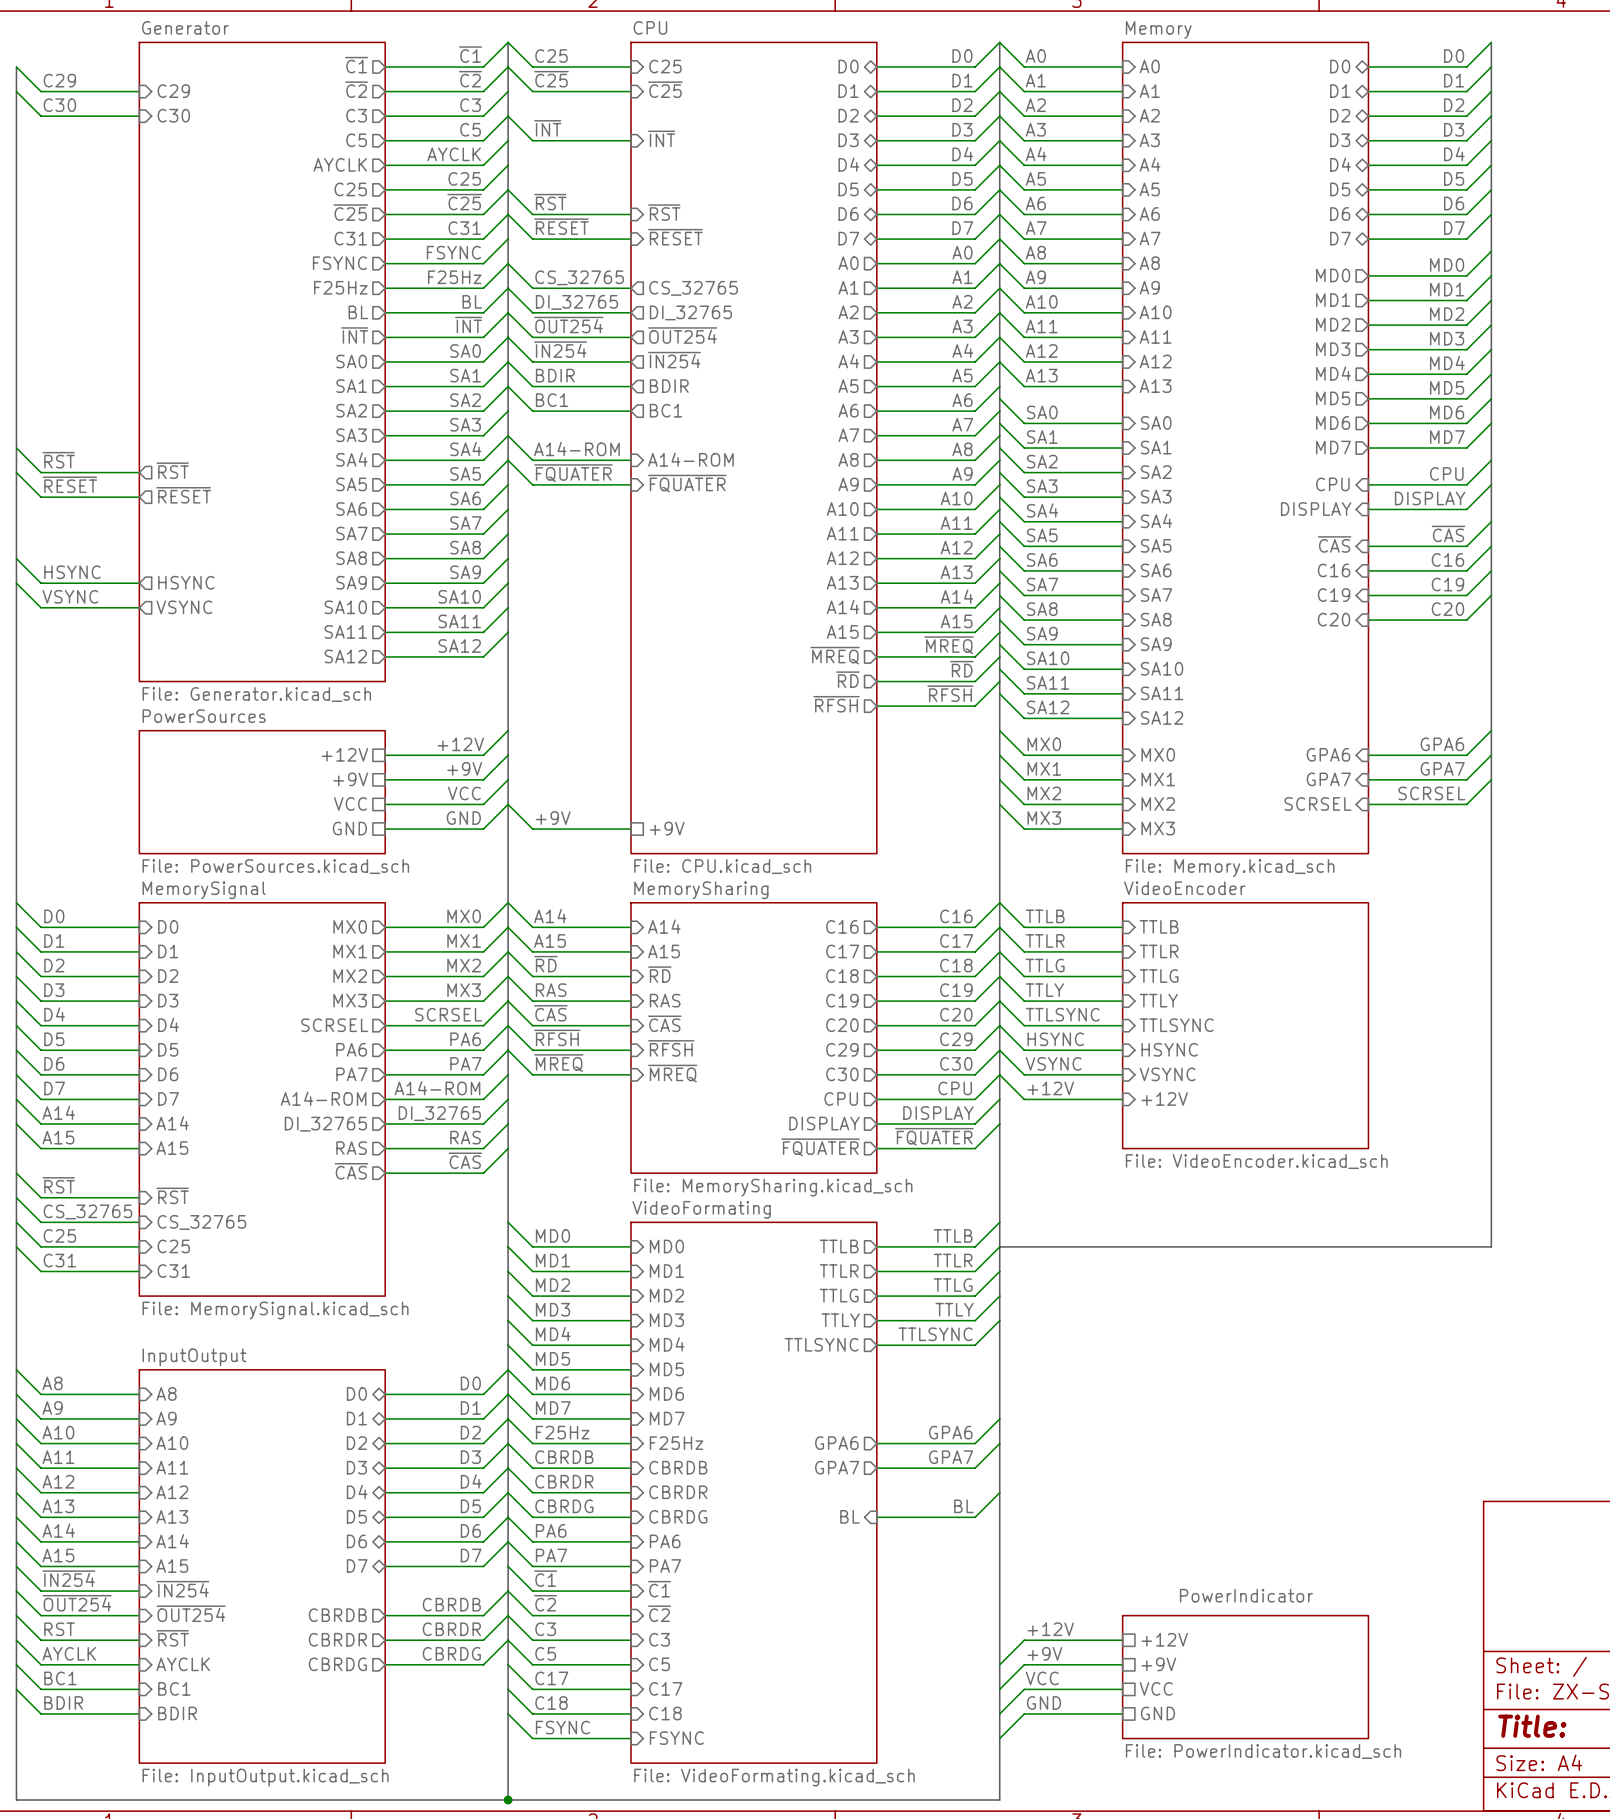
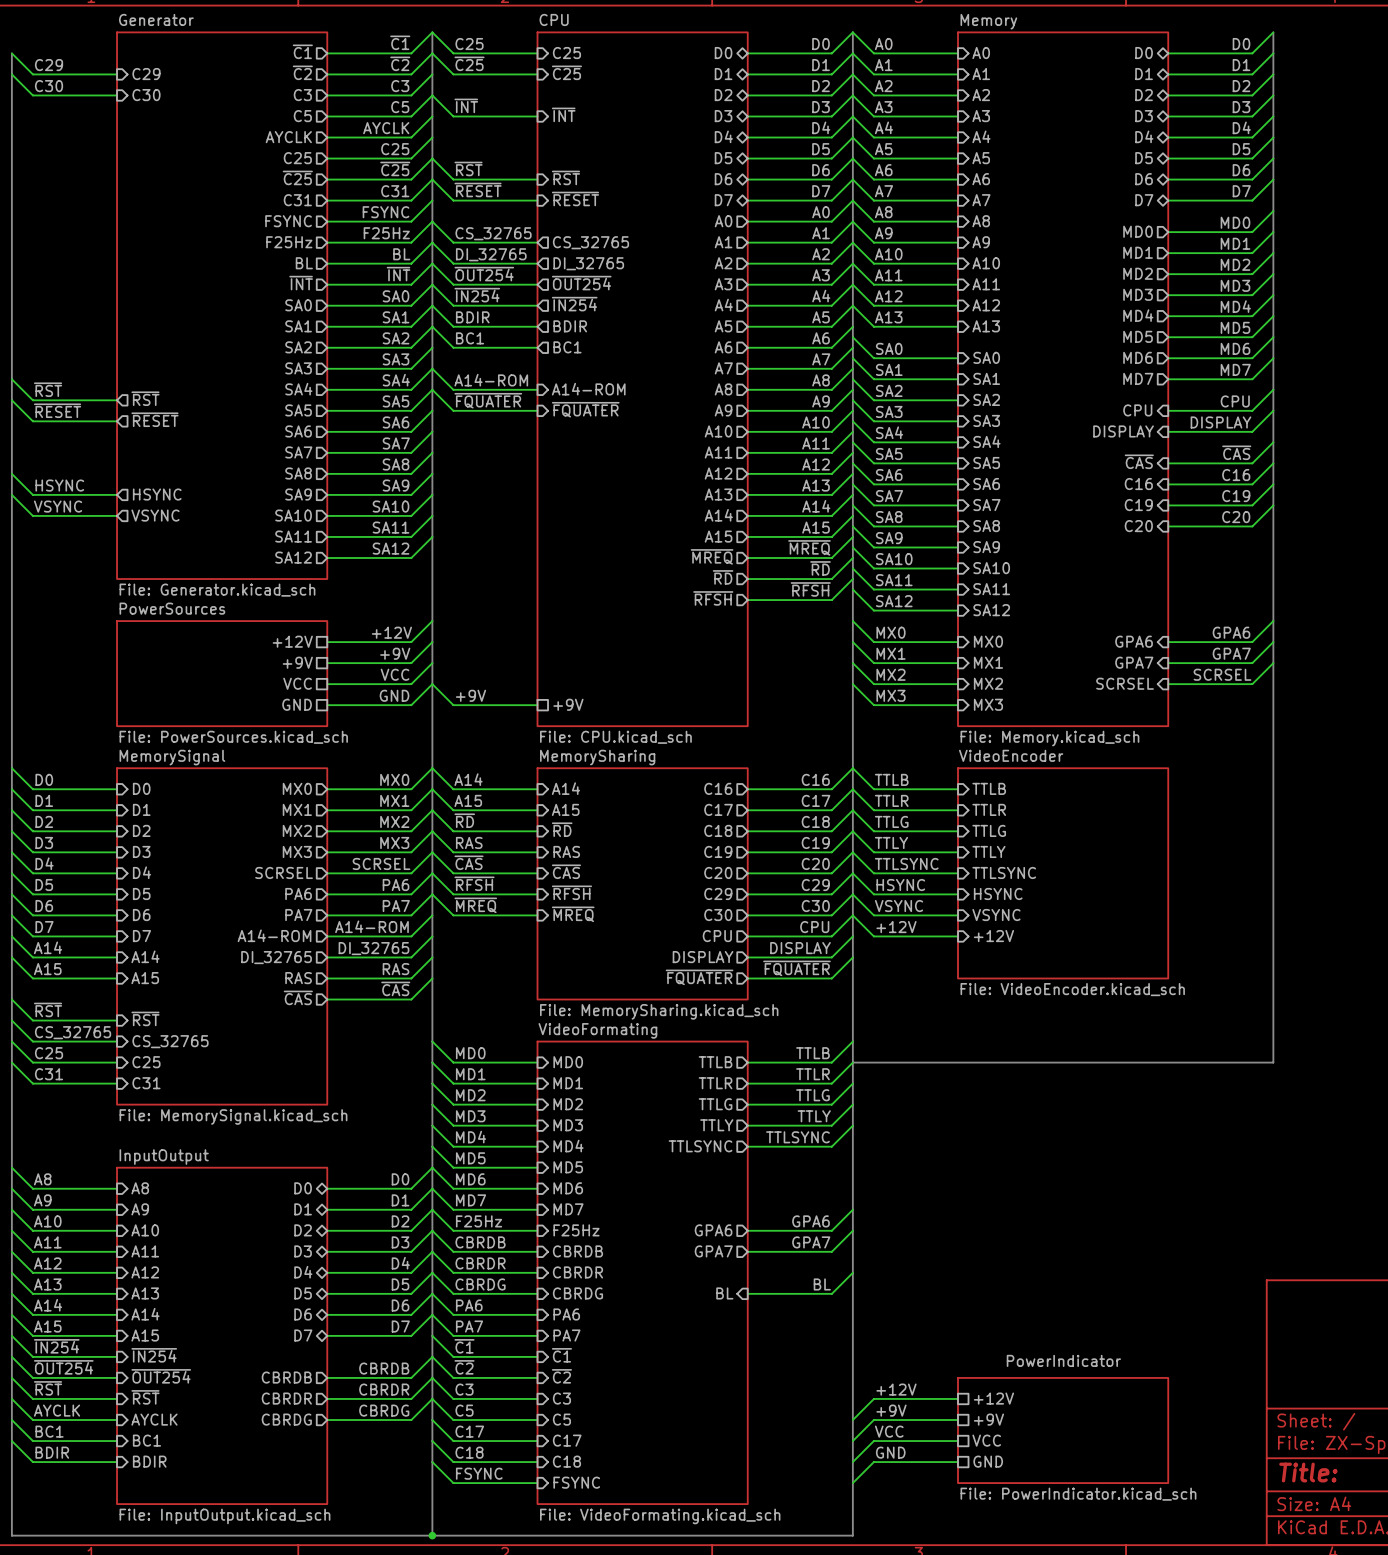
label: RST (59, 1629) -> ~{RST} (48, 1388)

